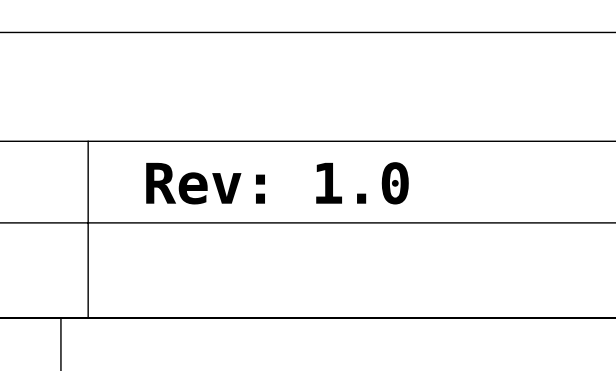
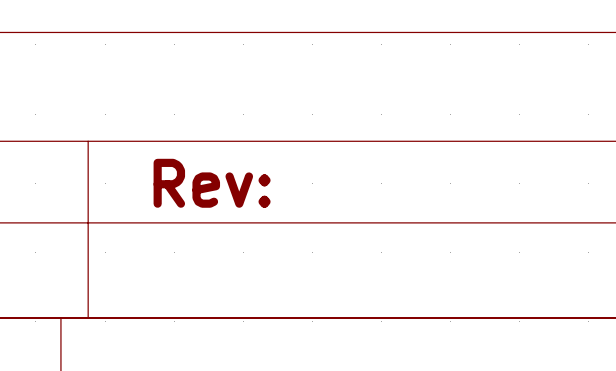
title block: Rev: 1.0 (277, 183) -> Rev: (212, 183)

